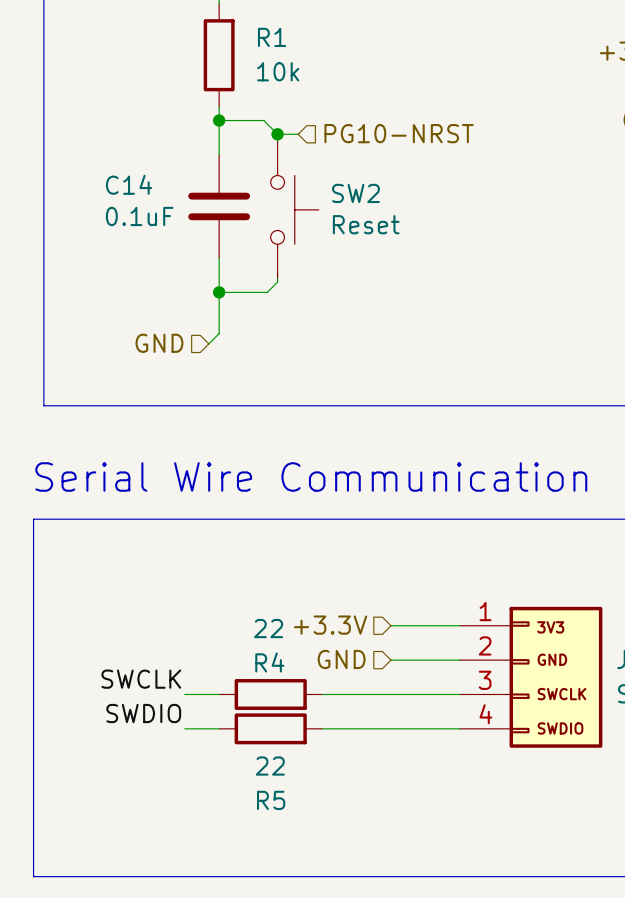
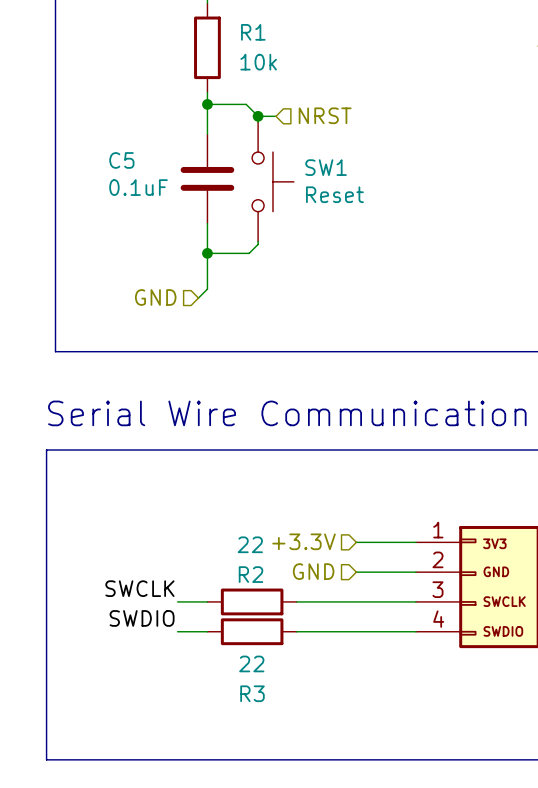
hierarchical label: PG10-NRST (399, 133) -> NRST (325, 115)
C14 name: C14 (129, 184) -> C5 (121, 160)
SW2 name: SW2 (355, 193) -> SW1 (326, 167)
R4 name: R4 (269, 662) -> R2 (251, 574)
R5 name: R5 (271, 800) -> R3 (252, 693)

